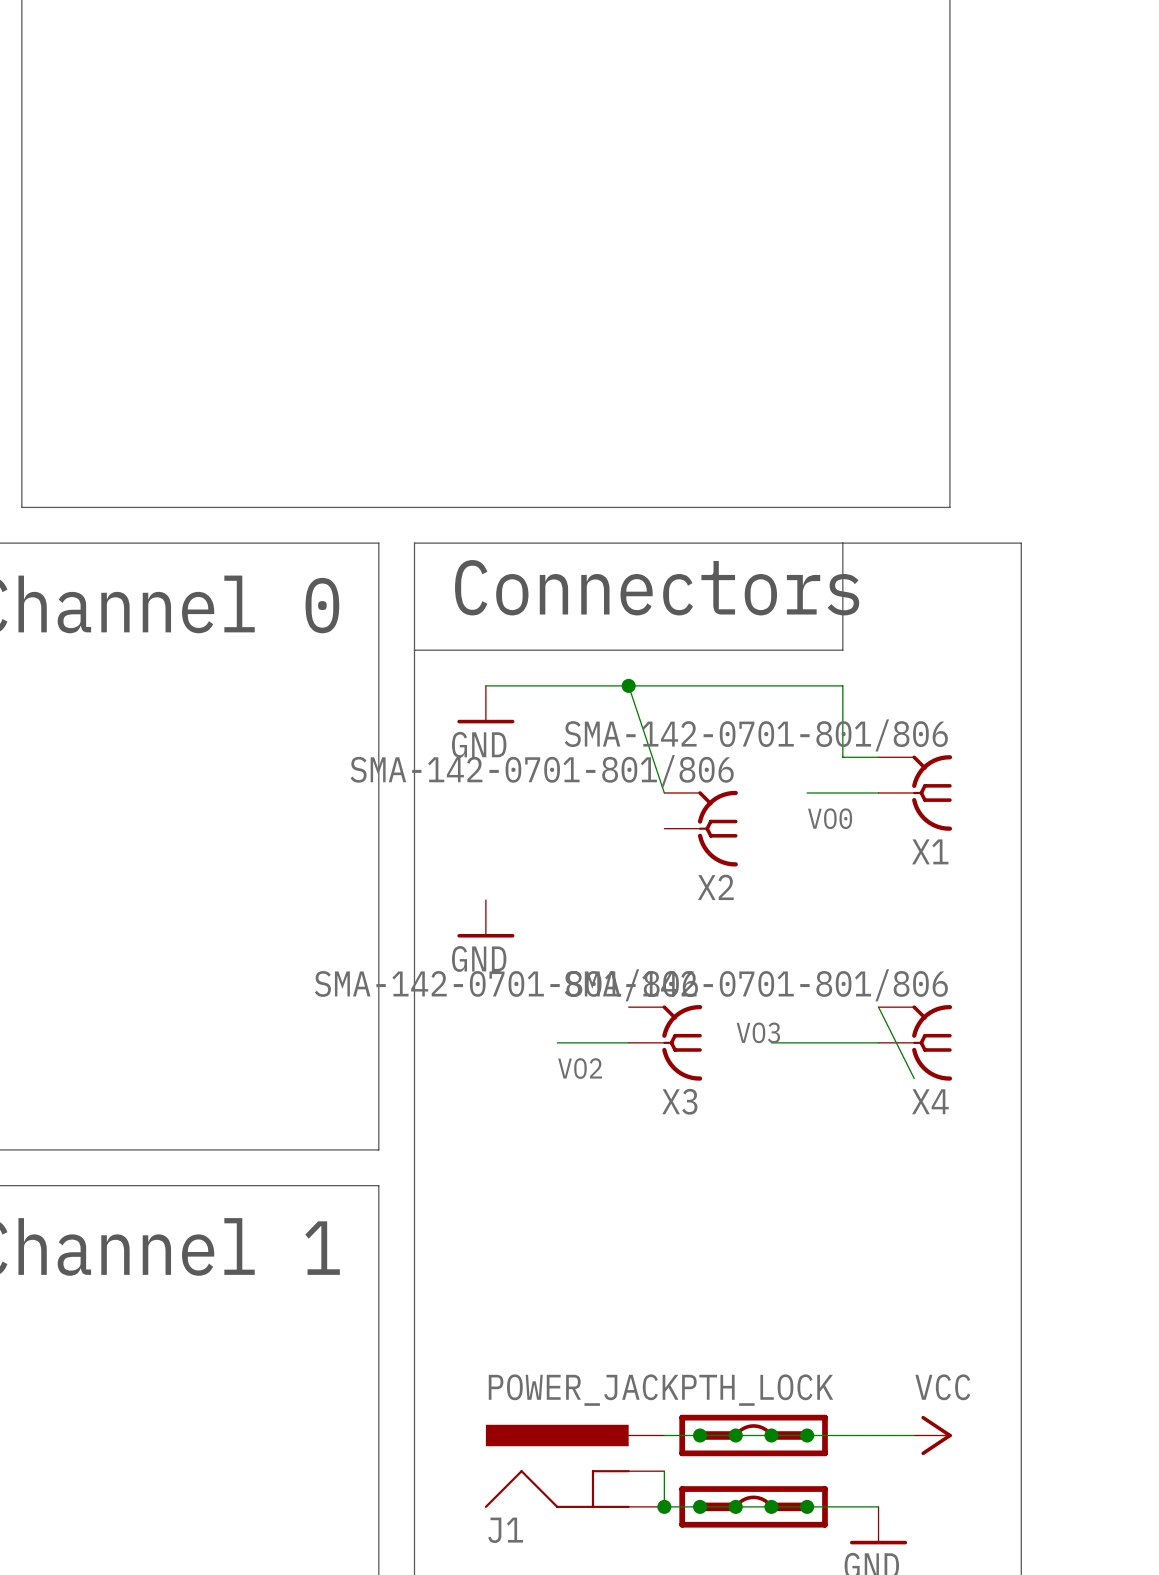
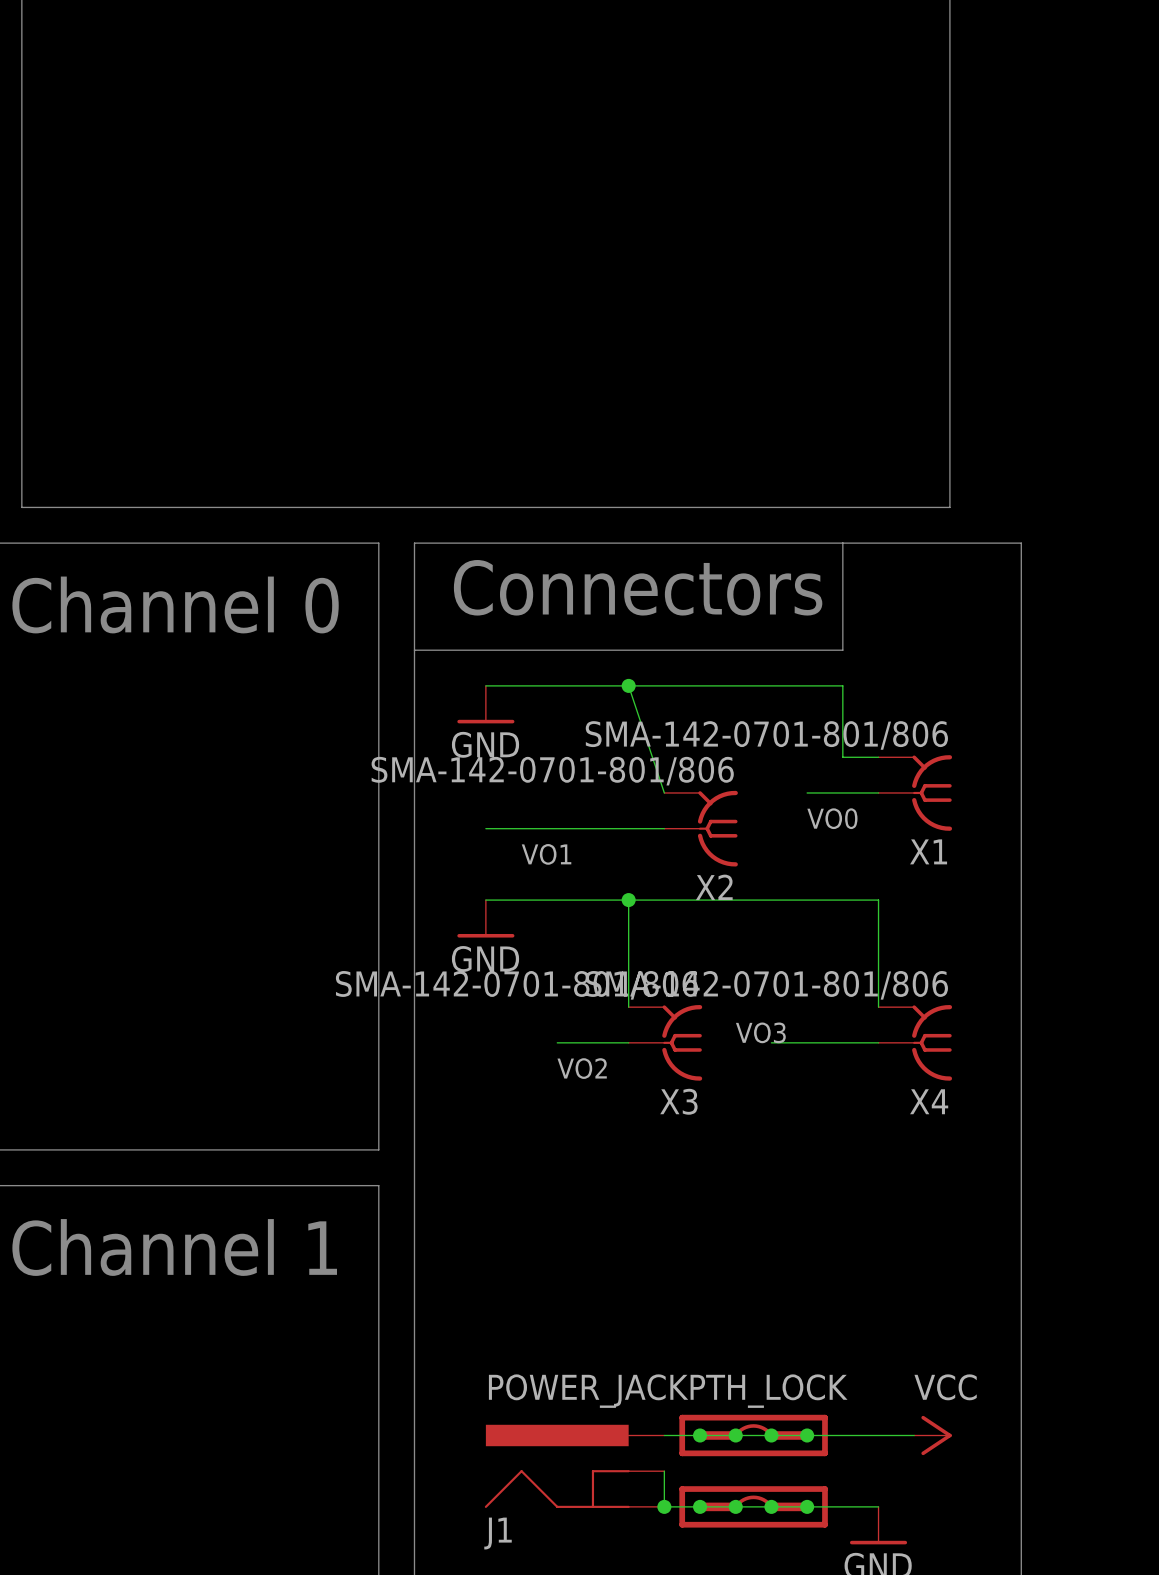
wire: none -> (485, 828) (664, 828)
label: none -> VO1 (546, 854)
wire: none -> (628, 900) (628, 1007)
junction: none -> (628, 900)
wire: (878, 1007) (914, 1078) -> (878, 1007) (878, 900) (485, 900)

